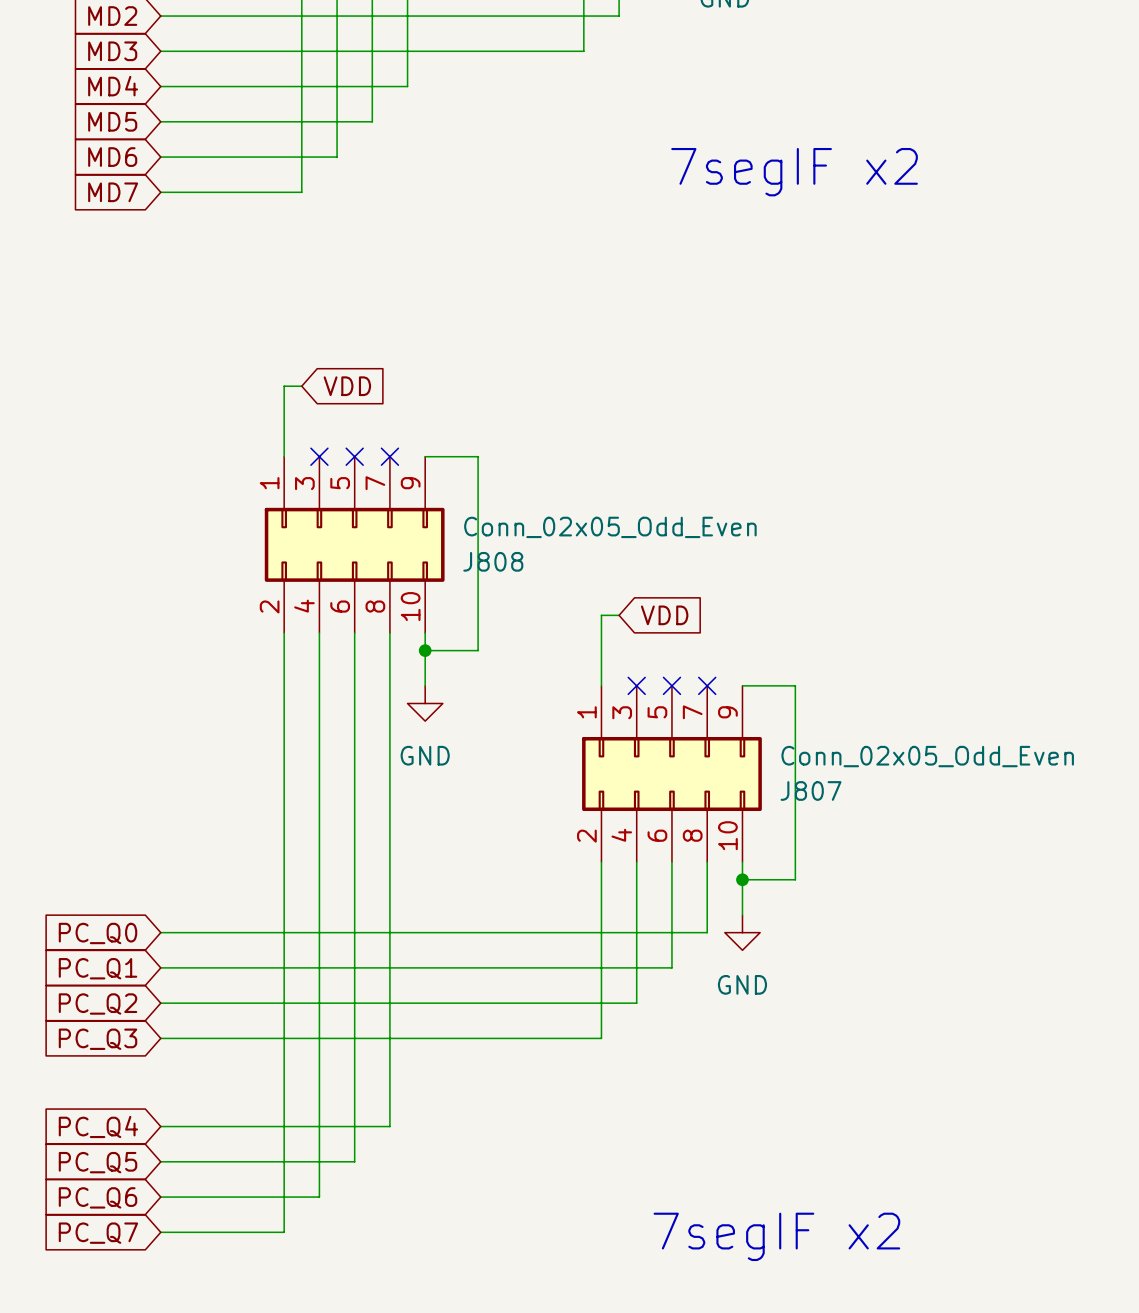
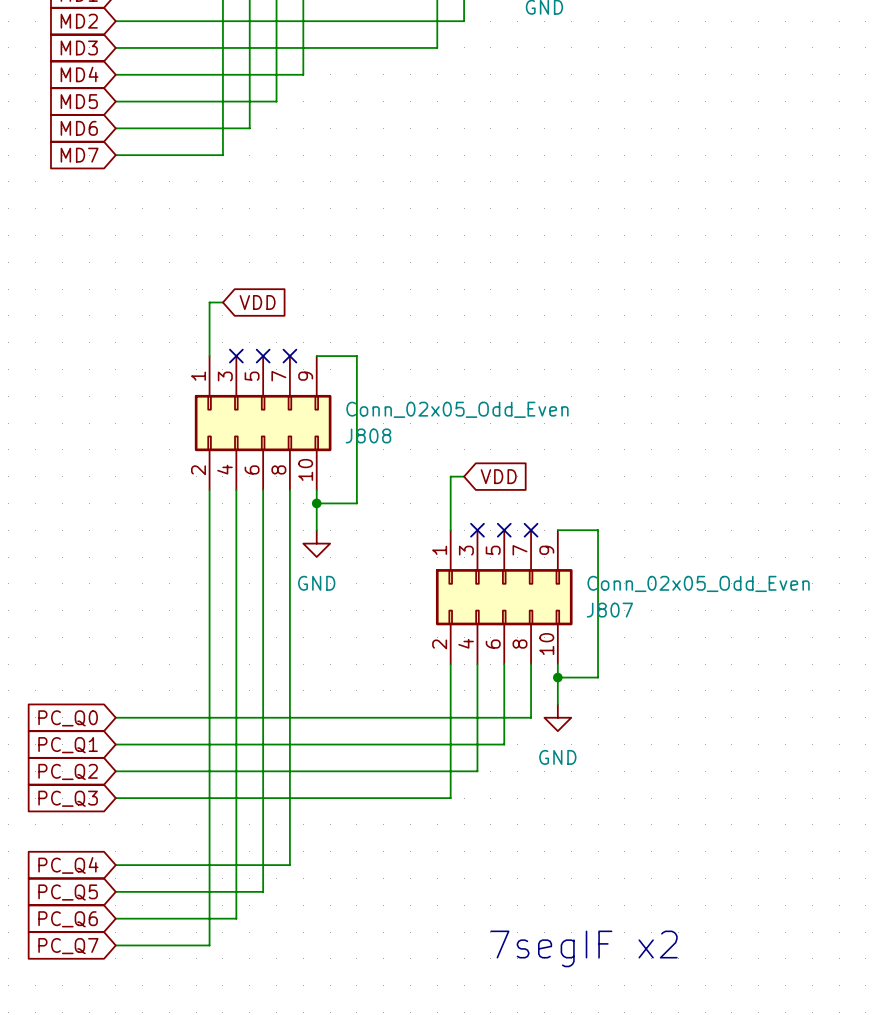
text: 7segIF x2 (794, 172) -> none

